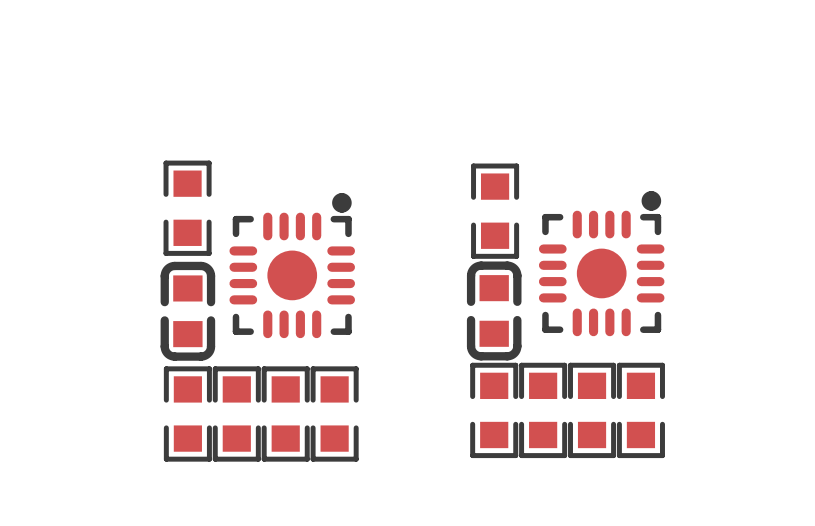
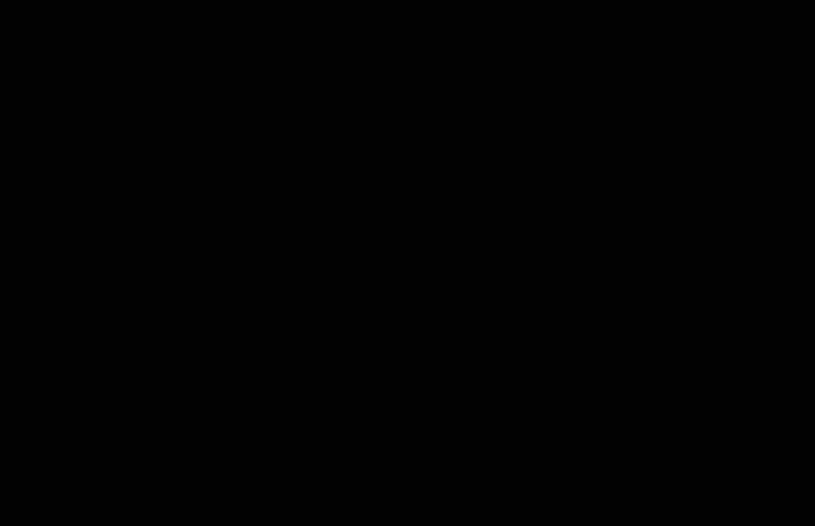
part: (187, 208) -> none
part: (495, 211) -> none
part: (601, 263) -> none
part: (292, 265) -> none
part: (494, 310) -> none
part: (187, 311) -> none
part: (494, 410) -> none
part: (543, 410) -> none
part: (592, 410) -> none
part: (640, 410) -> none
part: (187, 414) -> none
part: (236, 414) -> none
part: (285, 414) -> none
part: (334, 414) -> none

